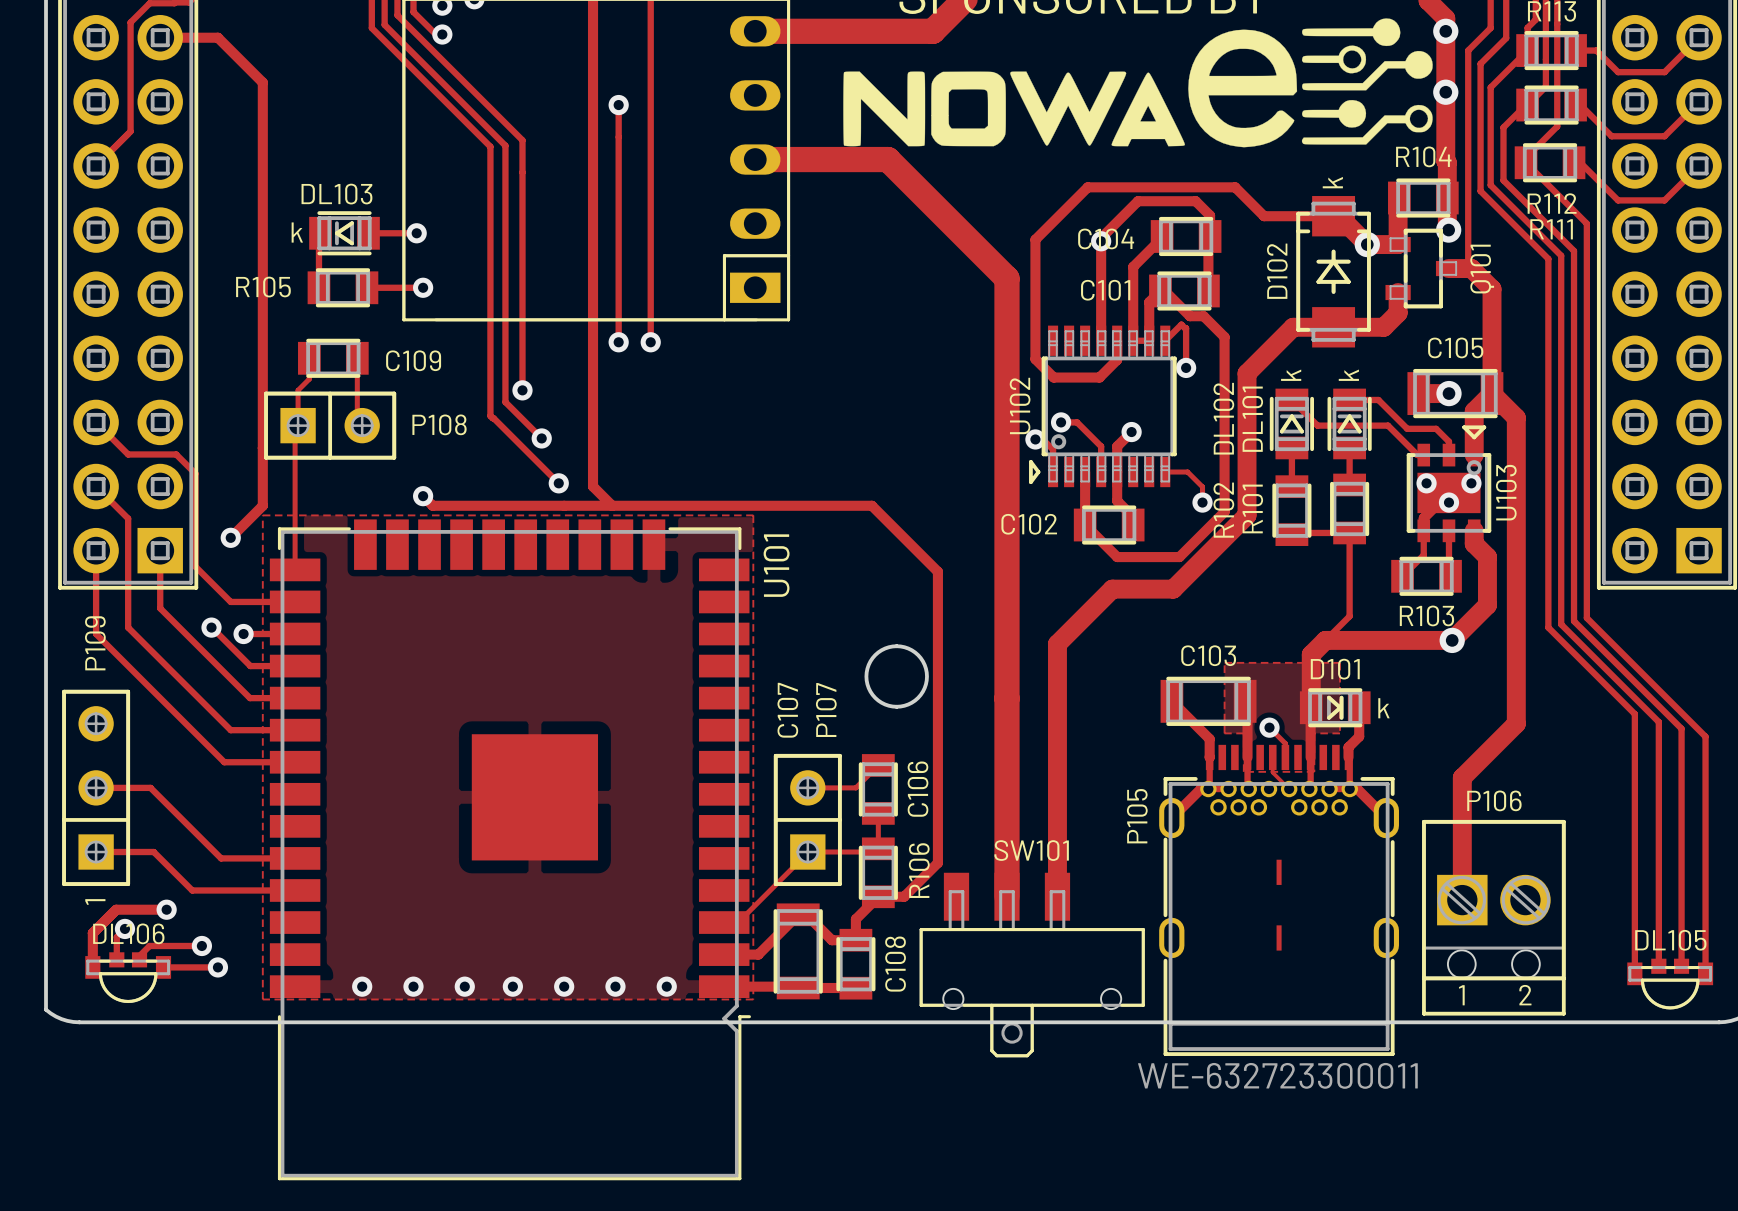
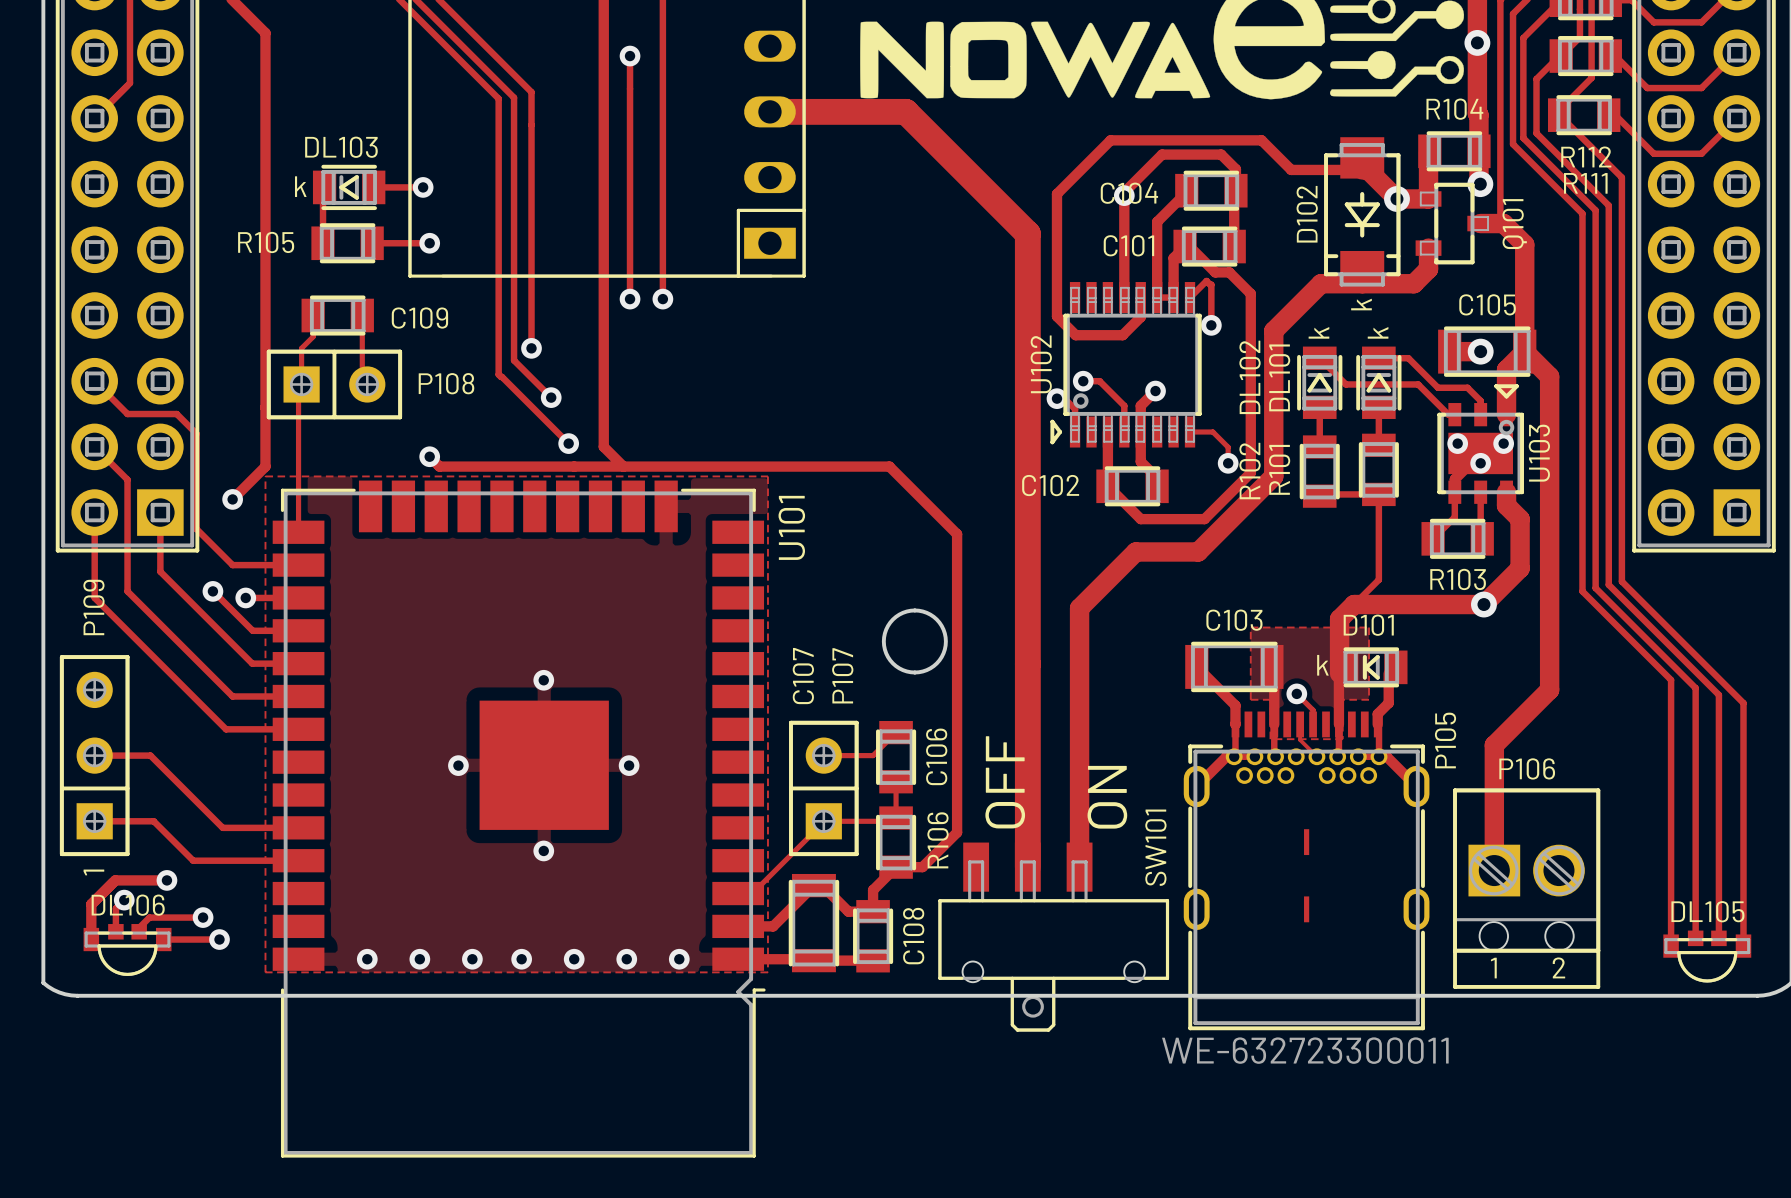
D102 rotation: 0° (1333, 271) -> 180° (1362, 214)
D101 rotation: 0° (1335, 707) -> 180° (1371, 667)
via: none -> (543, 680)
via: none -> (458, 765)
via: none -> (629, 765)
text: none -> OFF (1005, 782)
P105 name position: P105 (1137, 816) -> P105 (1445, 740)
text: none -> ON (1107, 797)
SW101 name rotation: 0° (1031, 850) -> 90° counterclockwise (1155, 847)
via: none -> (543, 850)

